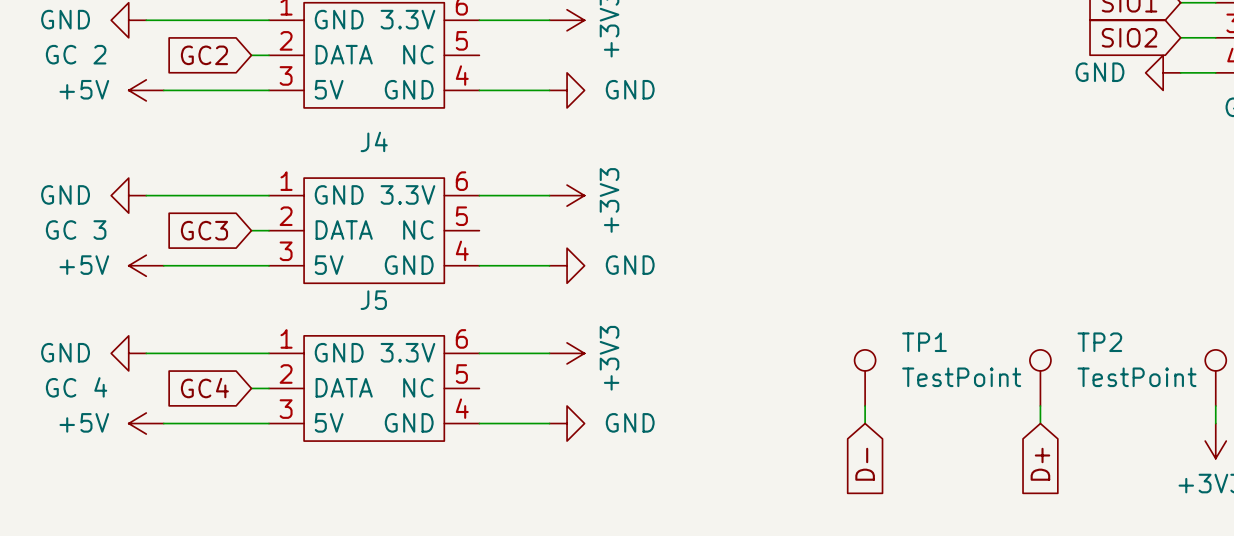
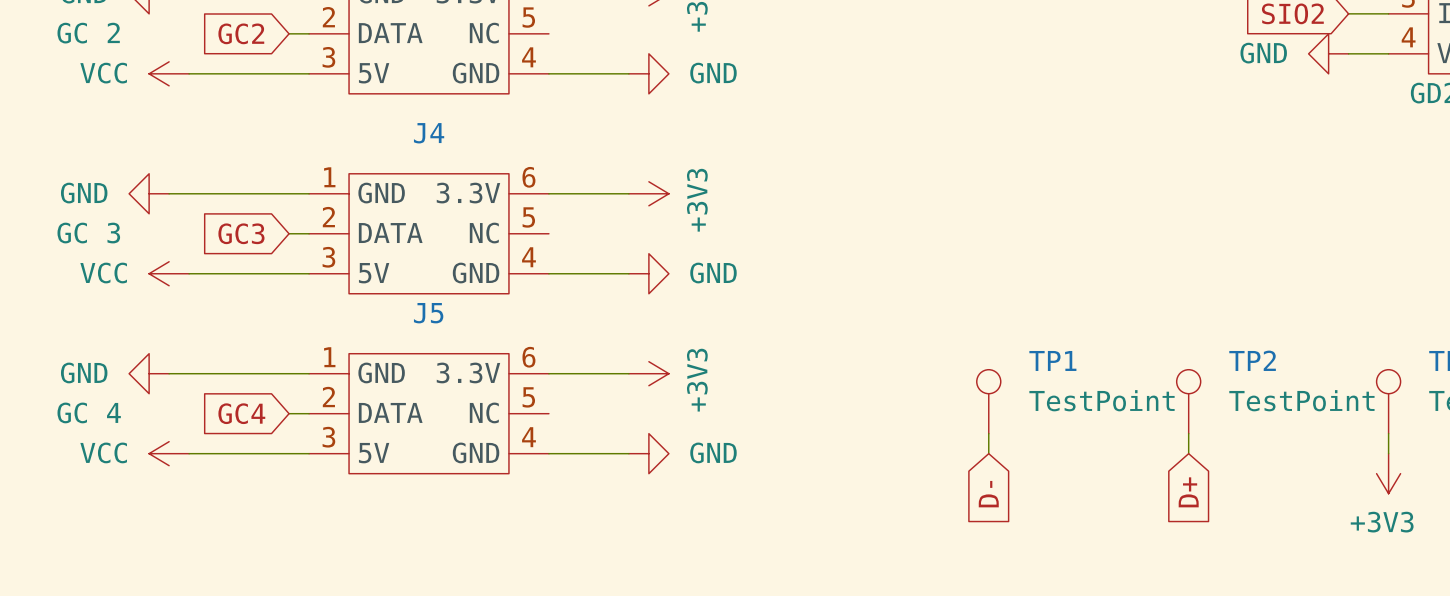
power symbol: +5V (146, 90) -> VCC (169, 73)
power symbol: +5V (146, 265) -> VCC (169, 273)
power symbol: +5V (146, 423) -> VCC (169, 453)

